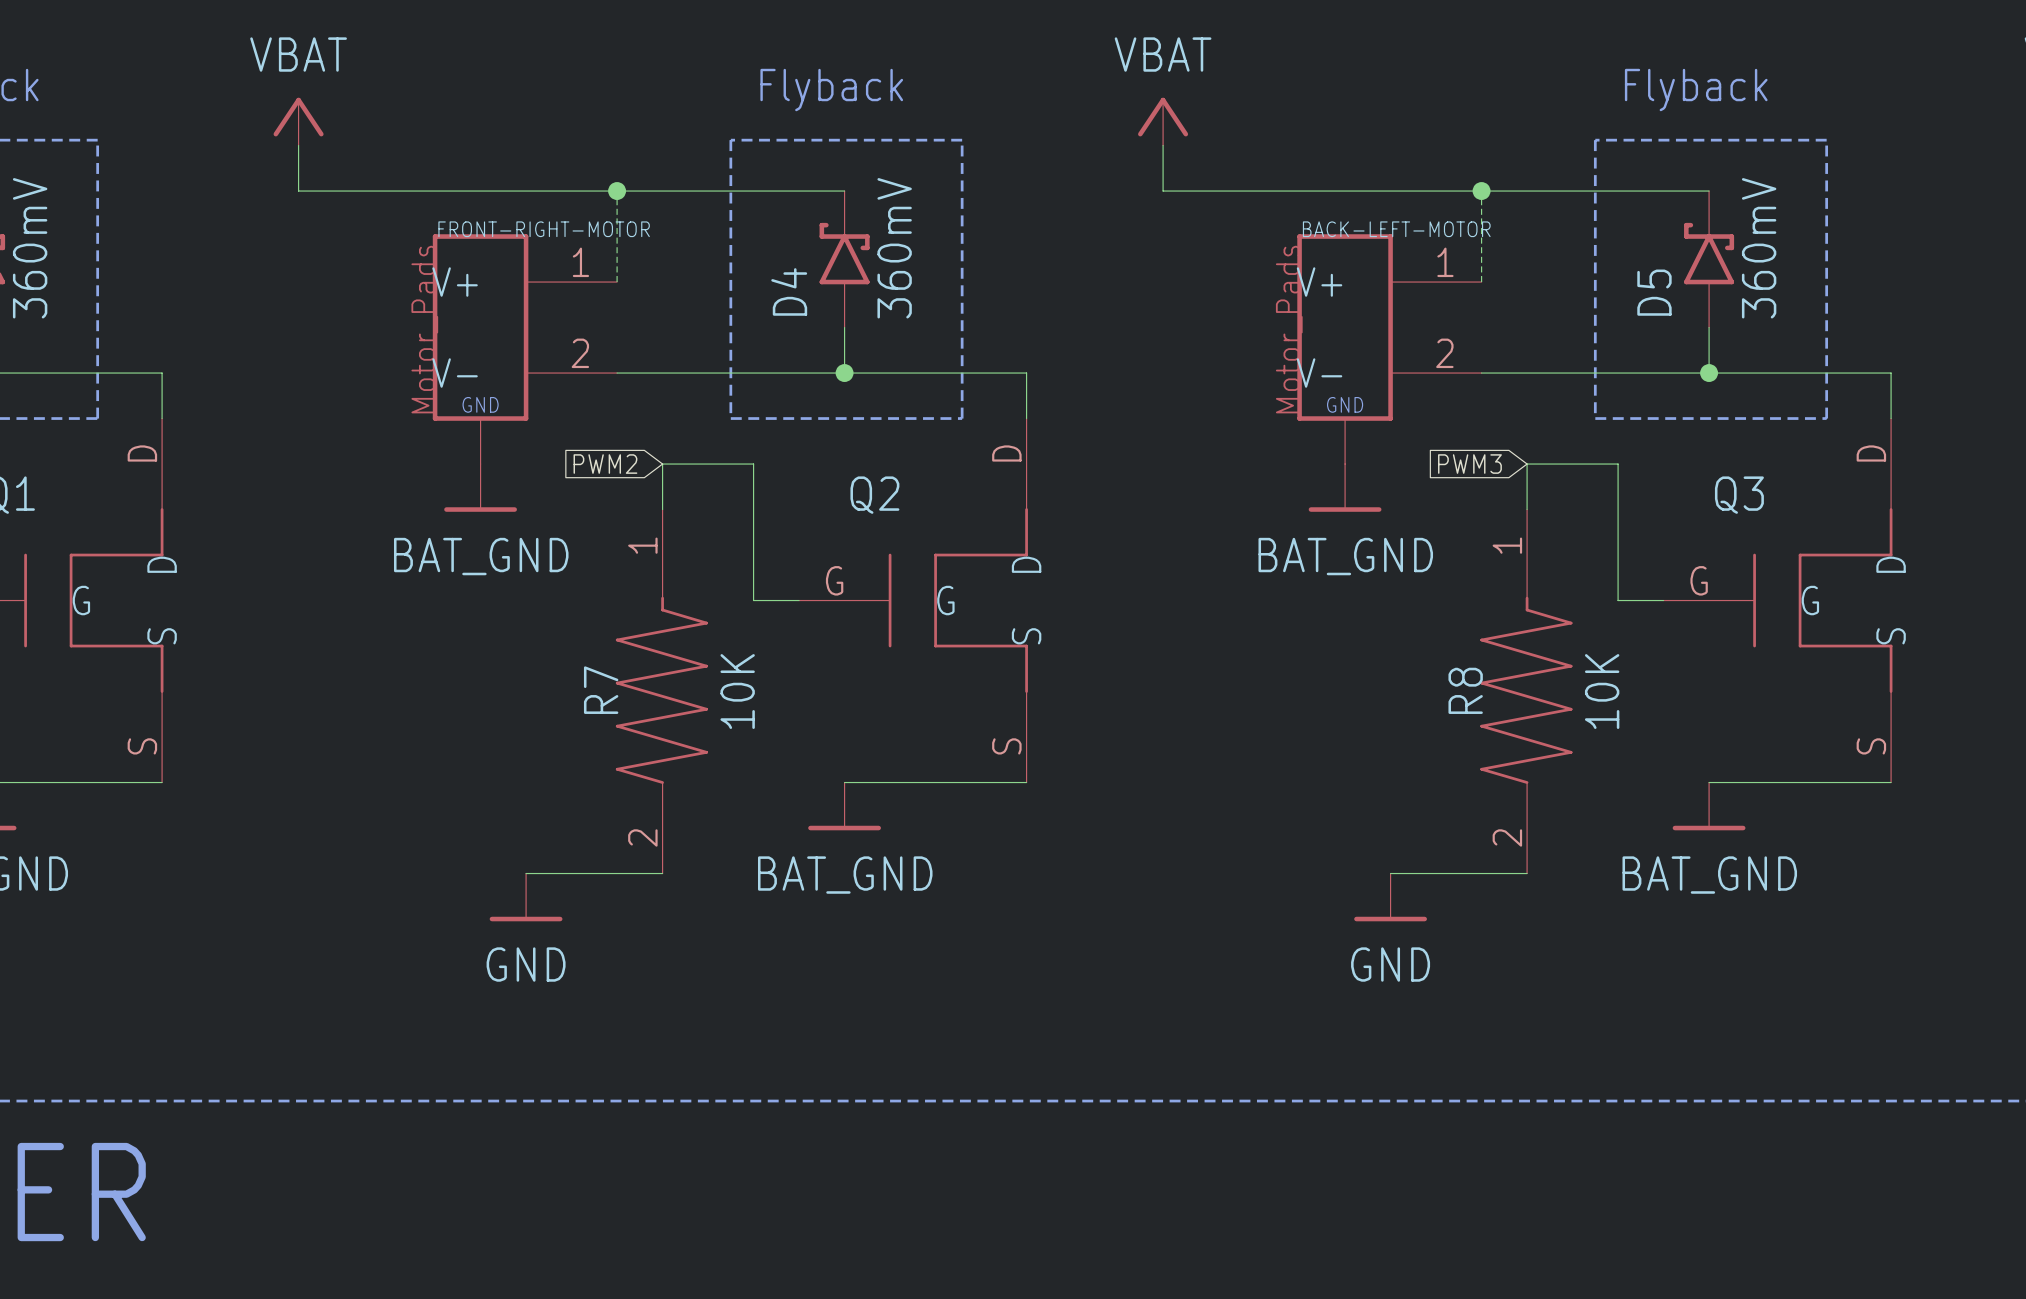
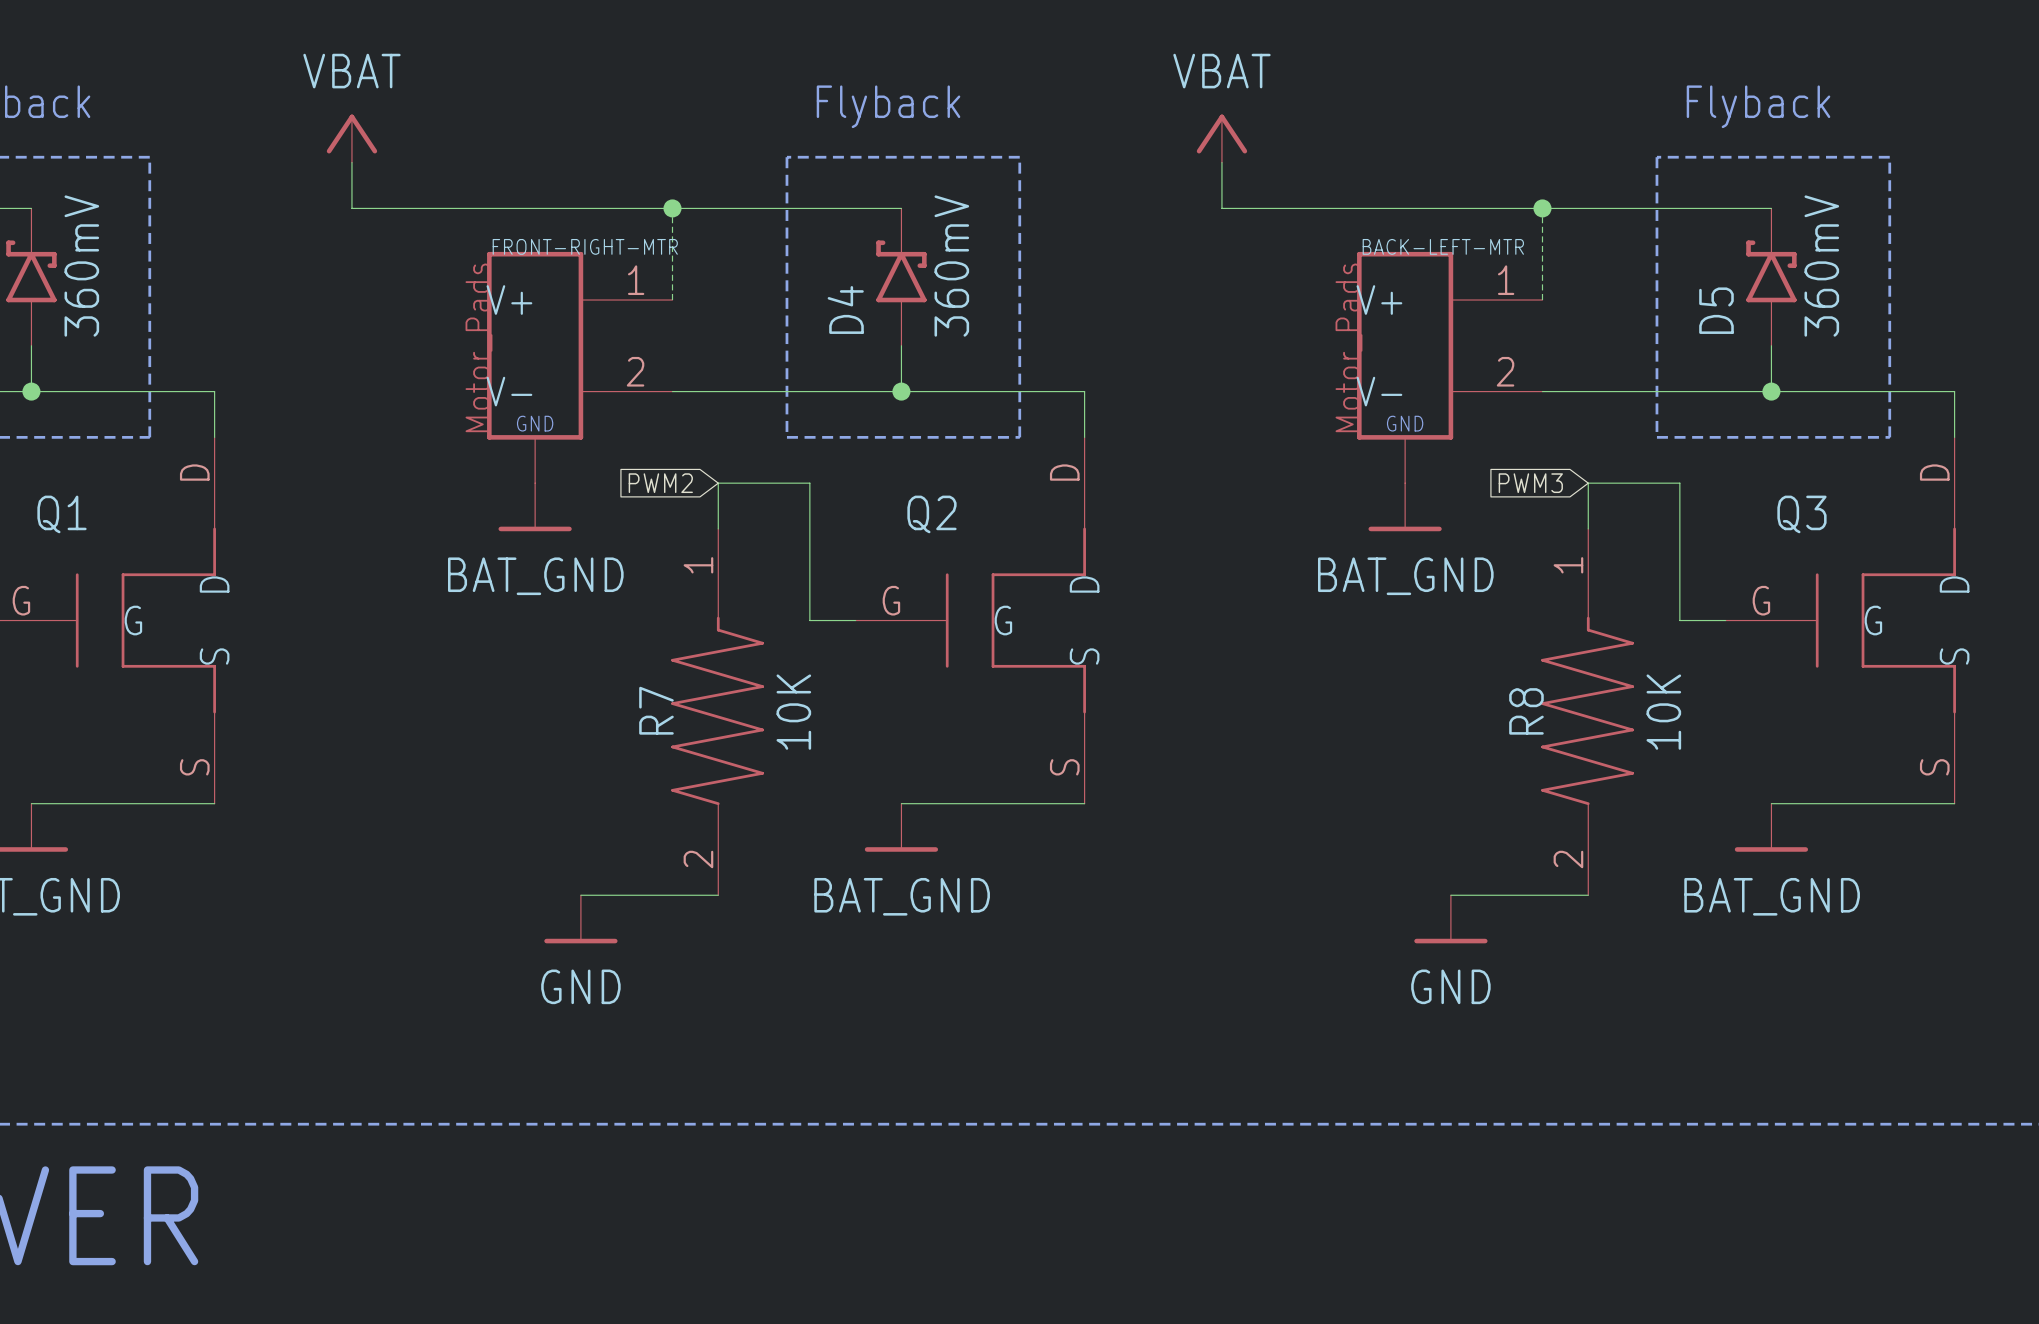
FRONT-RIGHT-MOTOR name: FRONT-RIGHT-MOTOR (544, 229) -> FRONT-RIGHT-MTR (585, 246)
BACK-LEFT-MOTOR name: BACK-LEFT-MOTOR (1396, 229) -> BACK-LEFT-MTR (1443, 246)

